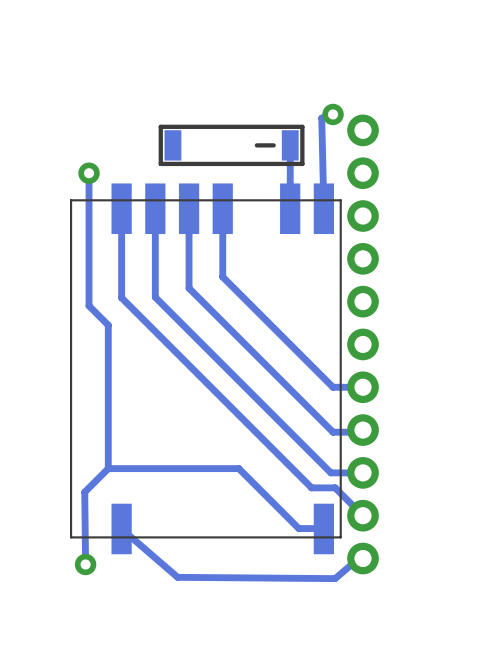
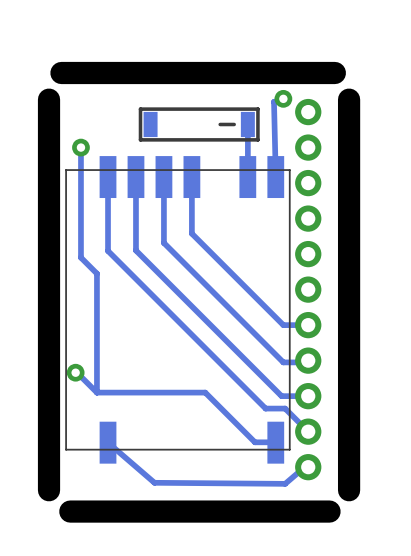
board edge: none -> (334, 73) (61, 73)
board edge: none -> (49, 99) (49, 490)
board edge: none -> (349, 99) (349, 490)
via: none -> (75, 372)
track: (108, 468) (84, 492) (85, 564) -> (96, 392) (75, 372)
via: (85, 564) -> none
board edge: none -> (329, 511) (70, 511)

